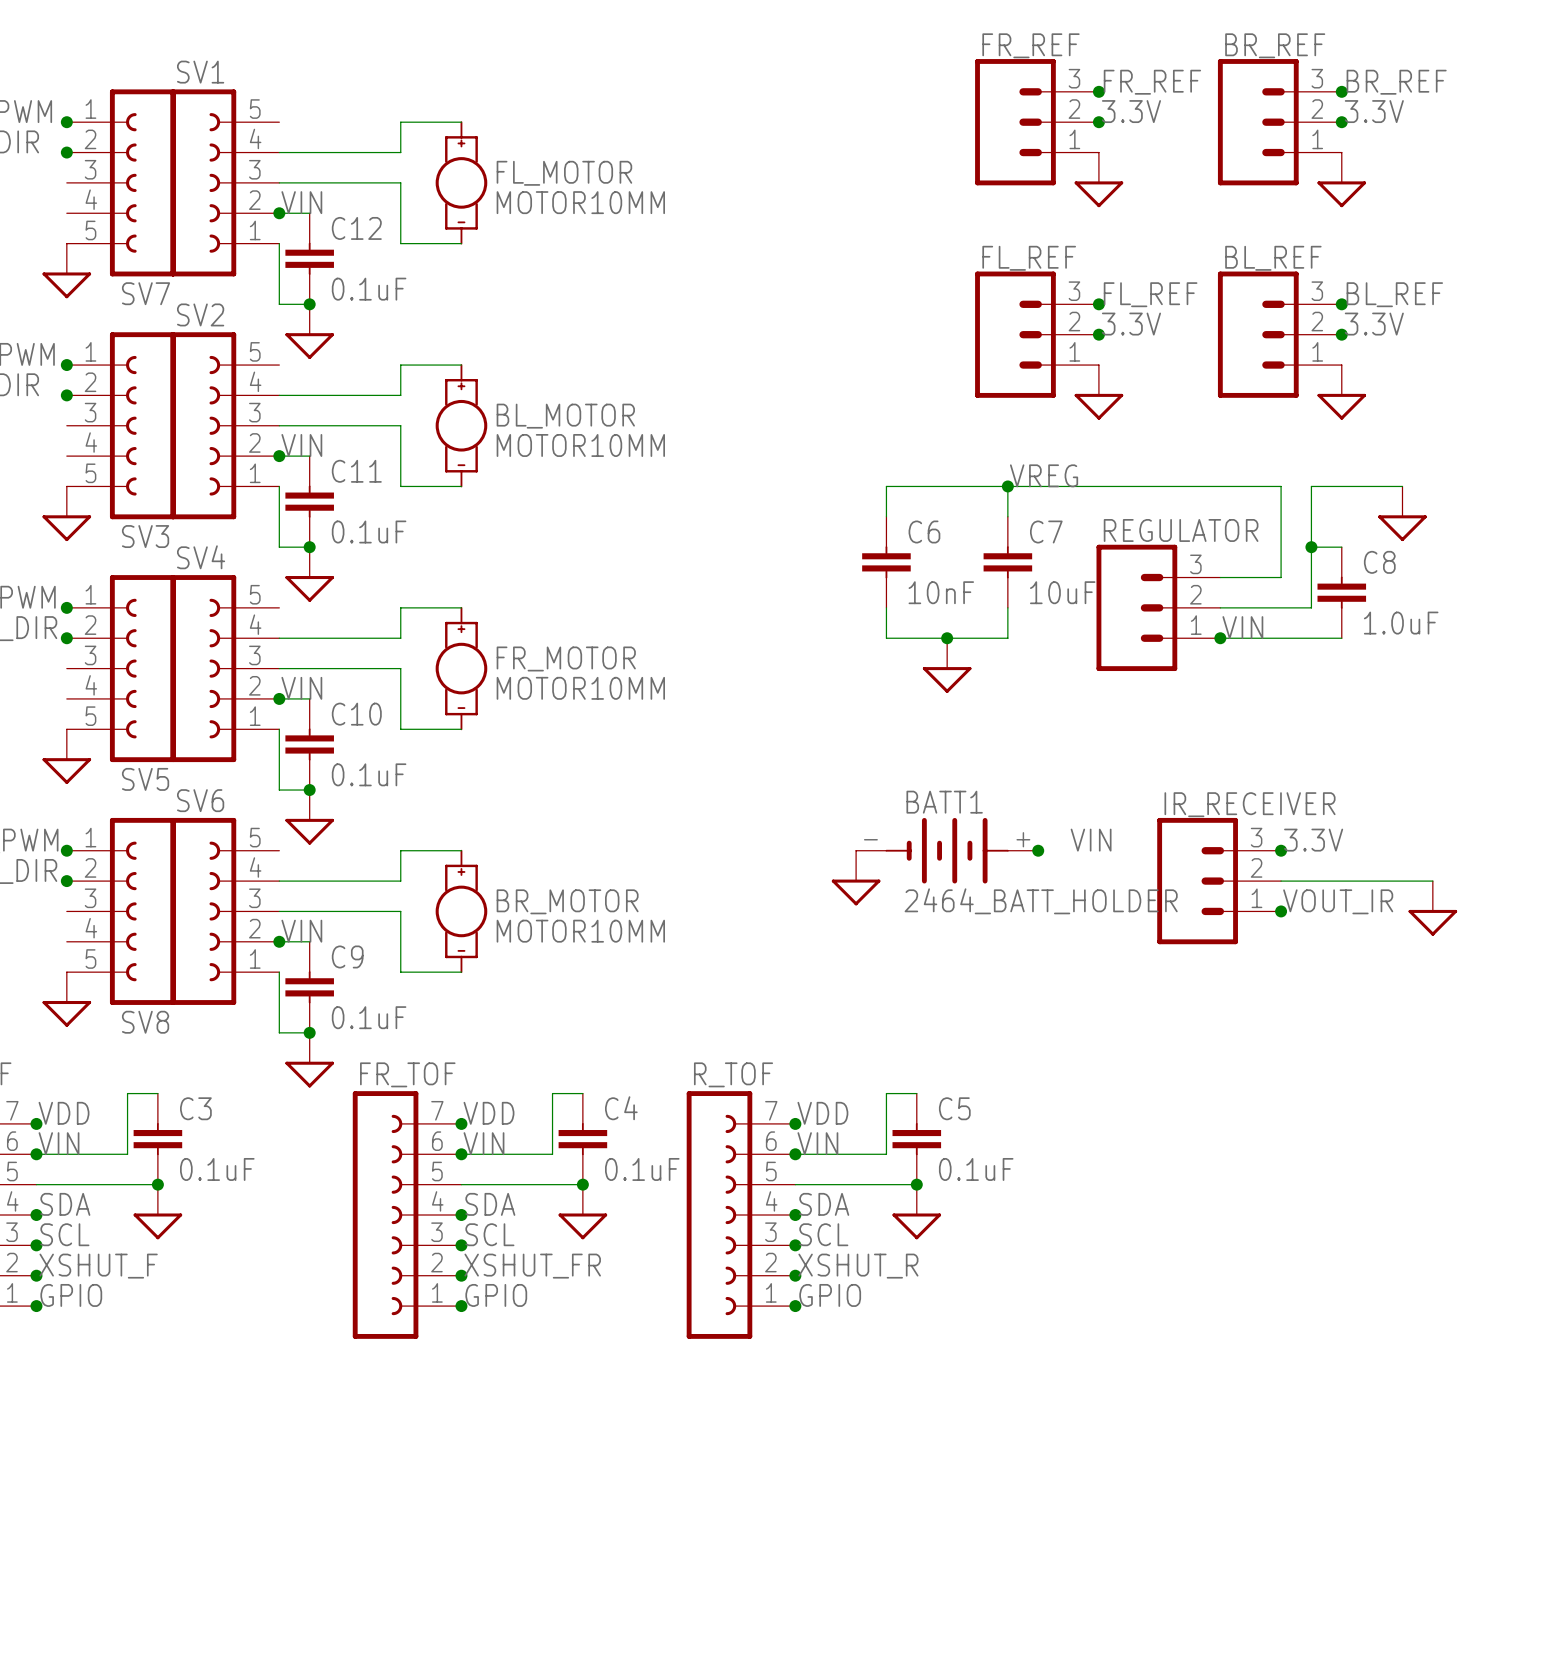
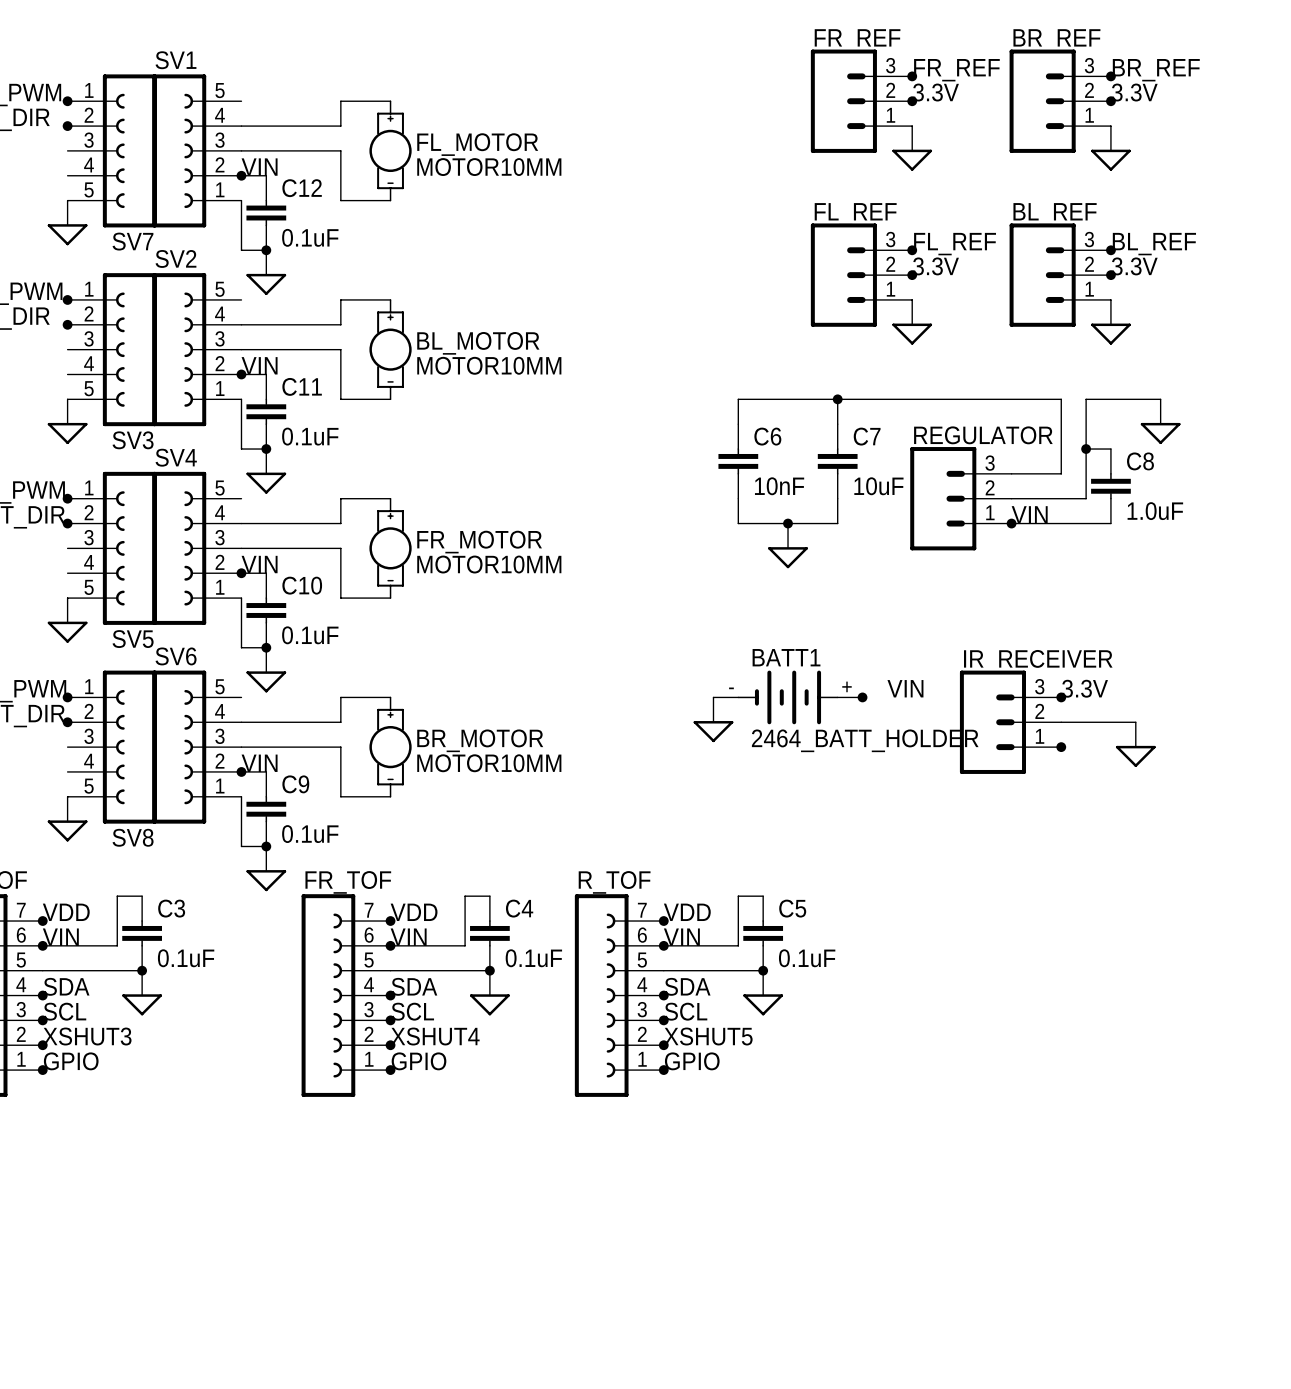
label: VREG (1044, 475) -> none
wire: (1372, 881) (1432, 881) -> none
label: VOUT_IR (1338, 901) -> none
power symbol position: (1432, 908) -> (1135, 744)
label: XSHUT_F (98, 1266) -> XSHUT3 (87, 1036)
label: XSHUT_FR (532, 1266) -> XSHUT4 (435, 1036)
label: XSHUT_R (858, 1266) -> XSHUT5 (708, 1036)

